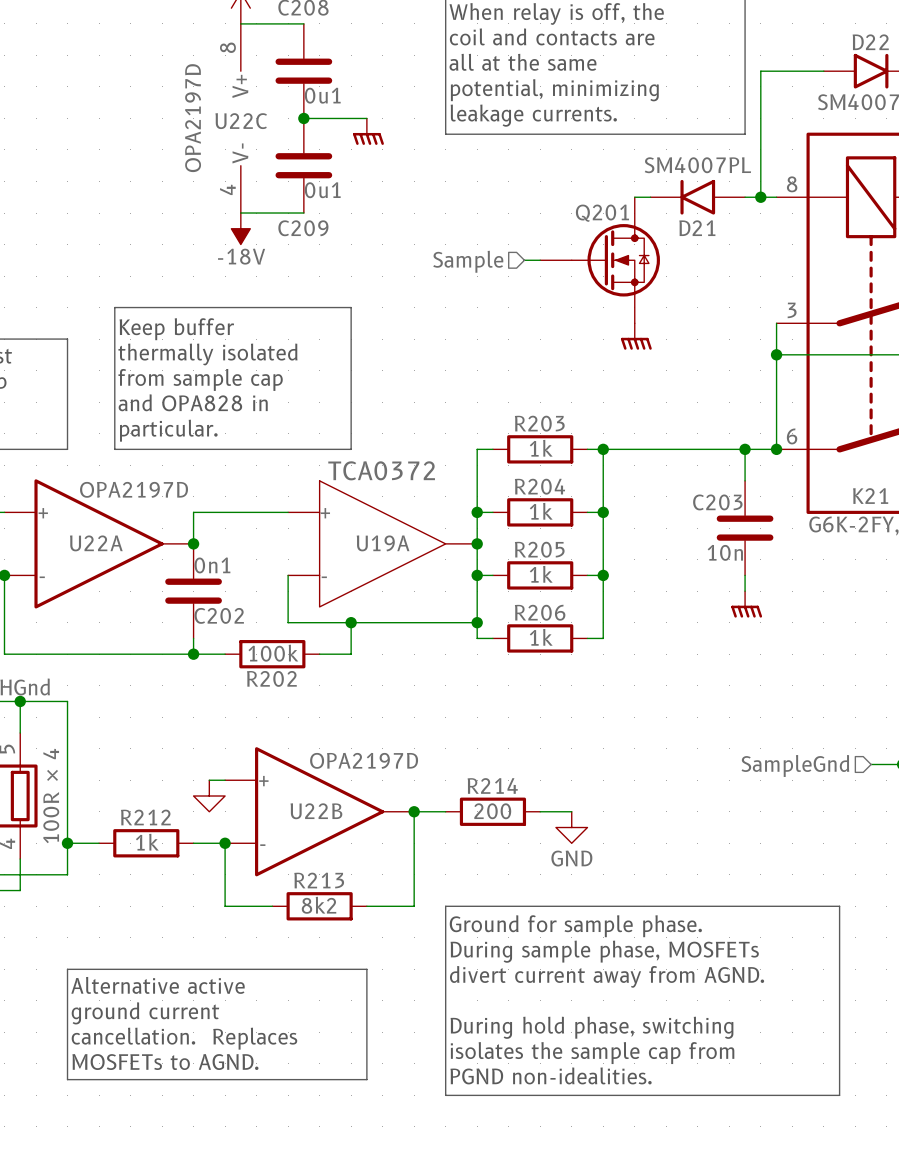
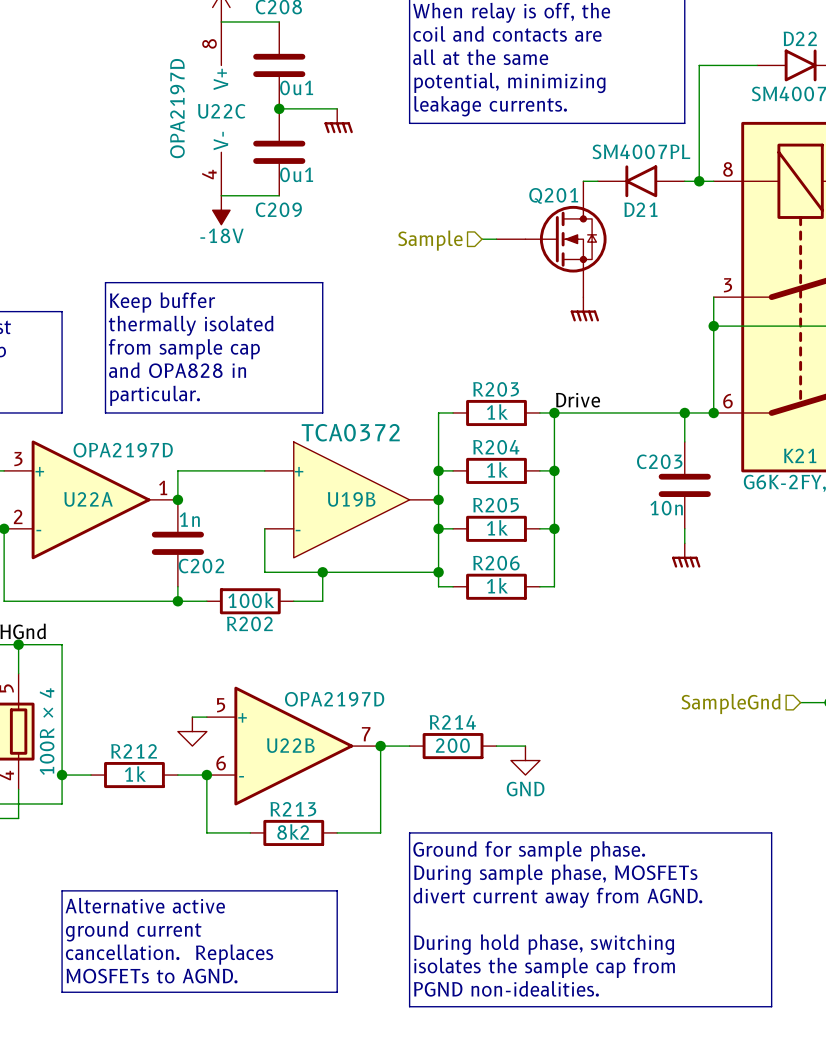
label: none -> Drive (578, 400)
U22A pin number: none -> 3 (18, 459)
U22A pin number: none -> 1 (163, 487)
U19A name: U19A (383, 543) -> U19B (351, 499)
U22A pin number: none -> 2 (18, 516)
C202 value: 0n1 (212, 565) -> 1n (189, 519)
U22B pin number: none -> 5 (221, 705)
U22B pin number: none -> 7 (366, 734)
U22B pin number: none -> 6 (221, 763)

